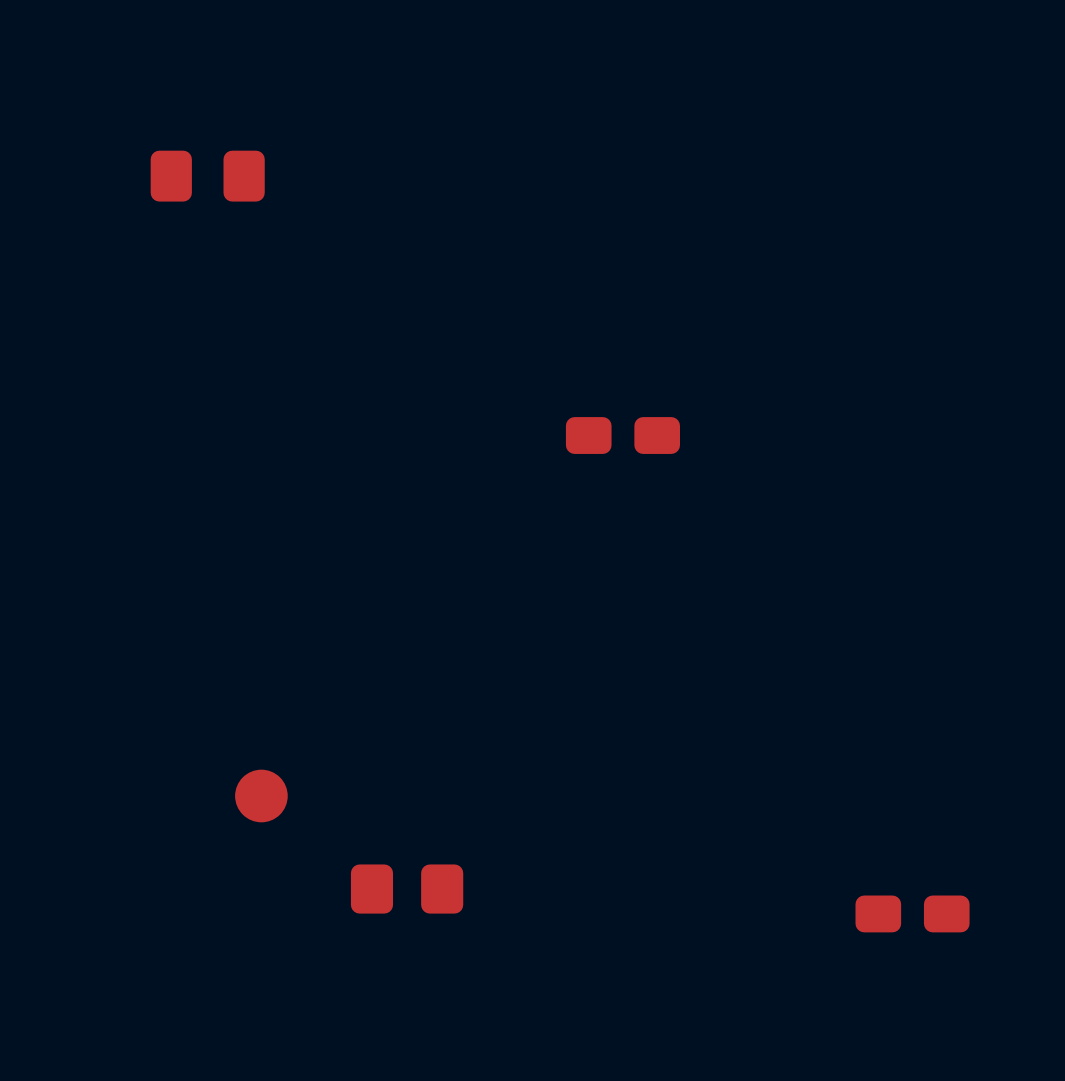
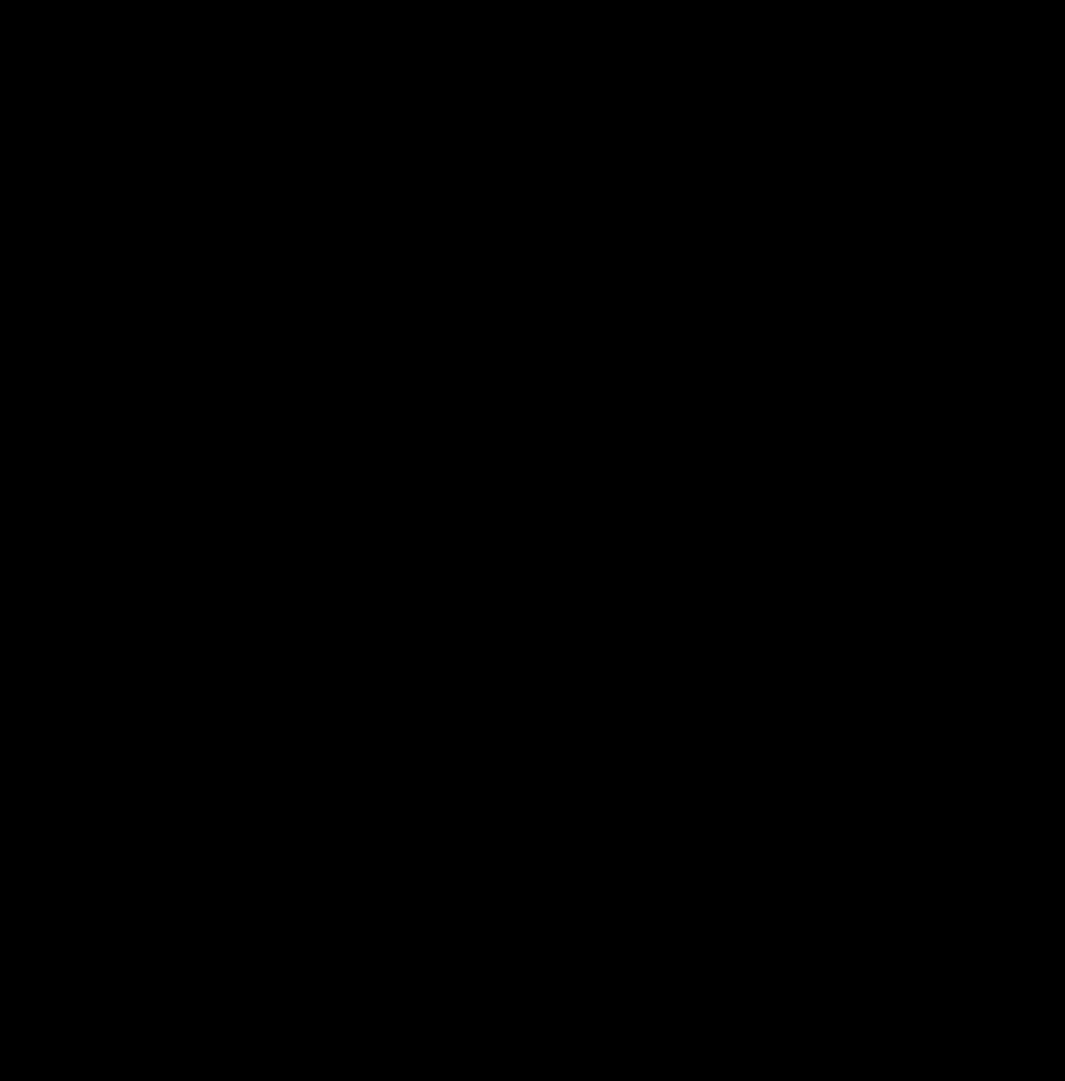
part: (207, 176) -> none
part: (622, 435) -> none
part: (261, 796) -> none
part: (407, 889) -> none
part: (912, 913) -> none

